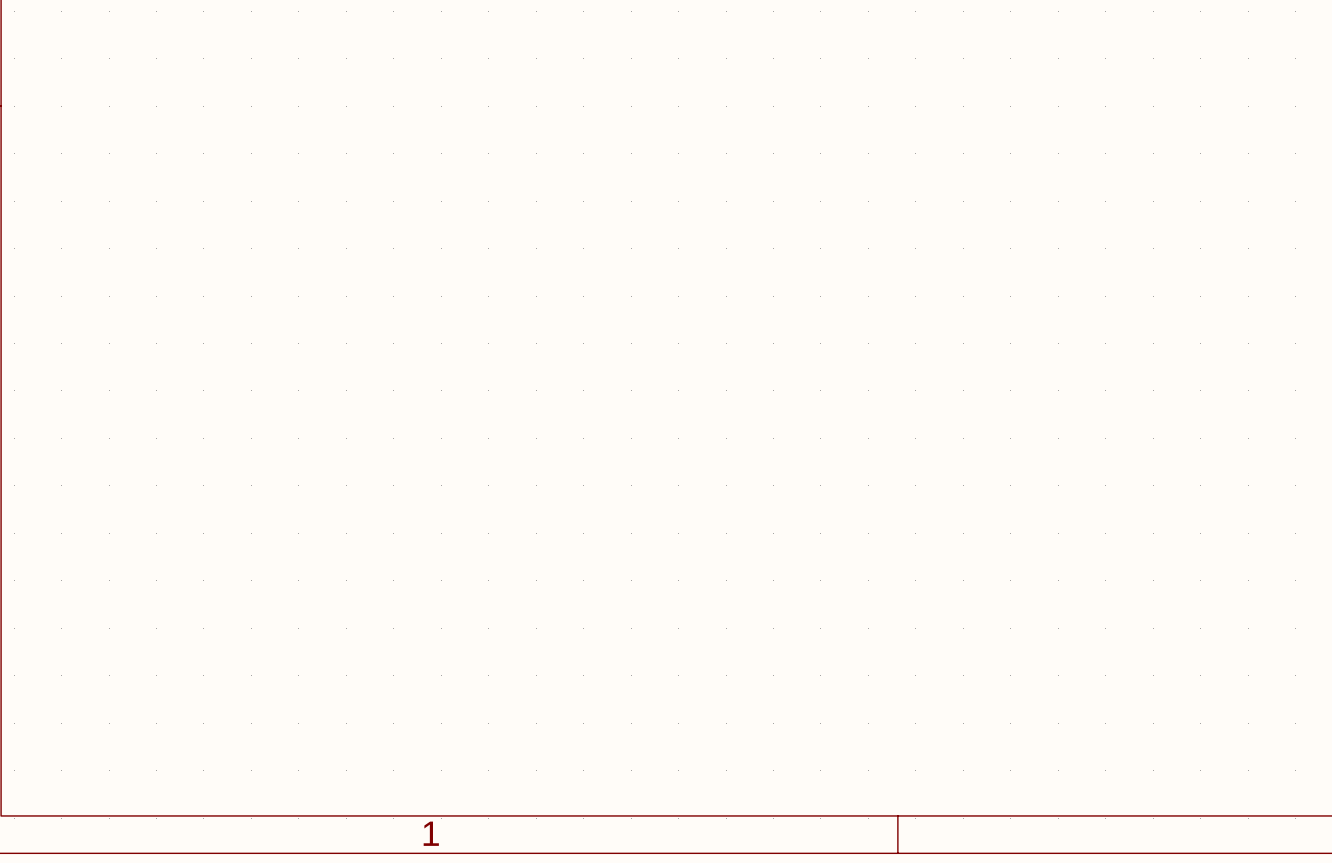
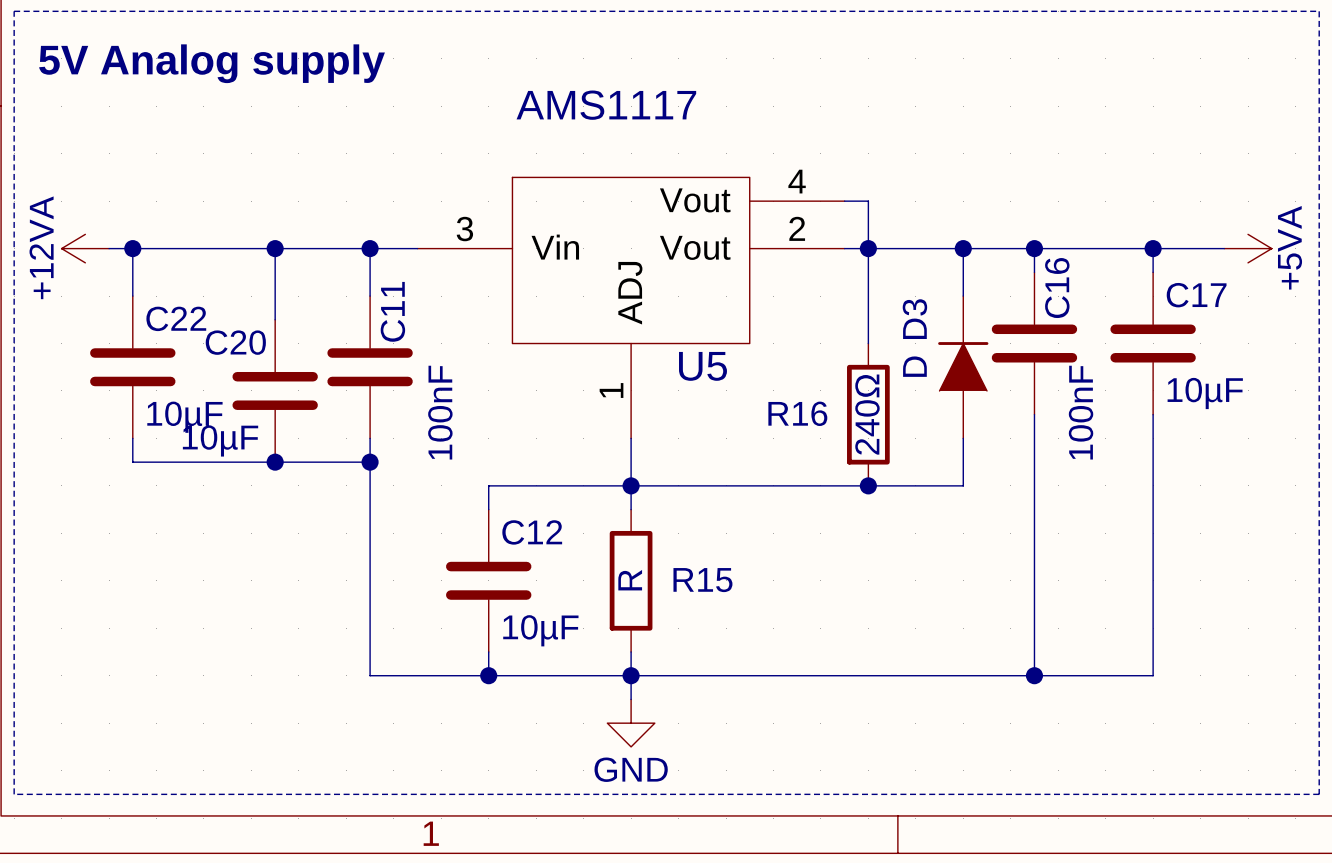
line: none -> (14, 11) (1319, 11) (1319, 794) (14, 794) (14, 11)
text: none -> 5V Analog supply (212, 63)
wire: none -> (844, 201) (868, 201) (868, 343)
power symbol: none -> +12VA (85, 248)
wire: none -> (109, 248) (417, 248)
wire: none -> (132, 248) (132, 296)
junction: none -> (132, 248)
wire: none -> (275, 248) (275, 319)
junction: none -> (275, 248)
wire: none -> (370, 248) (370, 296)
junction: none -> (370, 248)
wire: none -> (844, 248) (1224, 248)
junction: none -> (868, 248)
wire: none -> (963, 248) (963, 296)
junction: none -> (963, 248)
wire: none -> (1034, 248) (1034, 272)
junction: none -> (1034, 248)
wire: none -> (1153, 248) (1153, 272)
junction: none -> (1153, 248)
power symbol: none -> +5VA (1248, 248)
U5: none -> AMS1117 (631, 307)
C16: none -> 100nF (1034, 343)
C17: none -> 10µF (1153, 343)
C22: none -> 10µF (132, 367)
C11: none -> 100nF (370, 367)
D3: none -> D (963, 367)
C20: none -> 10µF (275, 390)
R16: none -> 240Ω (868, 414)
wire: none -> (1034, 414) (1034, 675)
wire: none -> (1153, 414) (1153, 675) (370, 675) (370, 438)
wire: none -> (132, 438) (132, 462) (370, 462)
wire: none -> (631, 438) (631, 509)
wire: none -> (963, 438) (963, 485) (488, 485) (488, 509)
junction: none -> (275, 462)
junction: none -> (370, 462)
junction: none -> (631, 485)
junction: none -> (868, 485)
C12: none -> 10µF (488, 580)
R15: none -> R (631, 580)
wire: none -> (488, 651) (488, 675)
wire: none -> (631, 651) (631, 699)
junction: none -> (488, 675)
junction: none -> (631, 675)
junction: none -> (1034, 675)
power symbol: none -> GND (631, 723)

